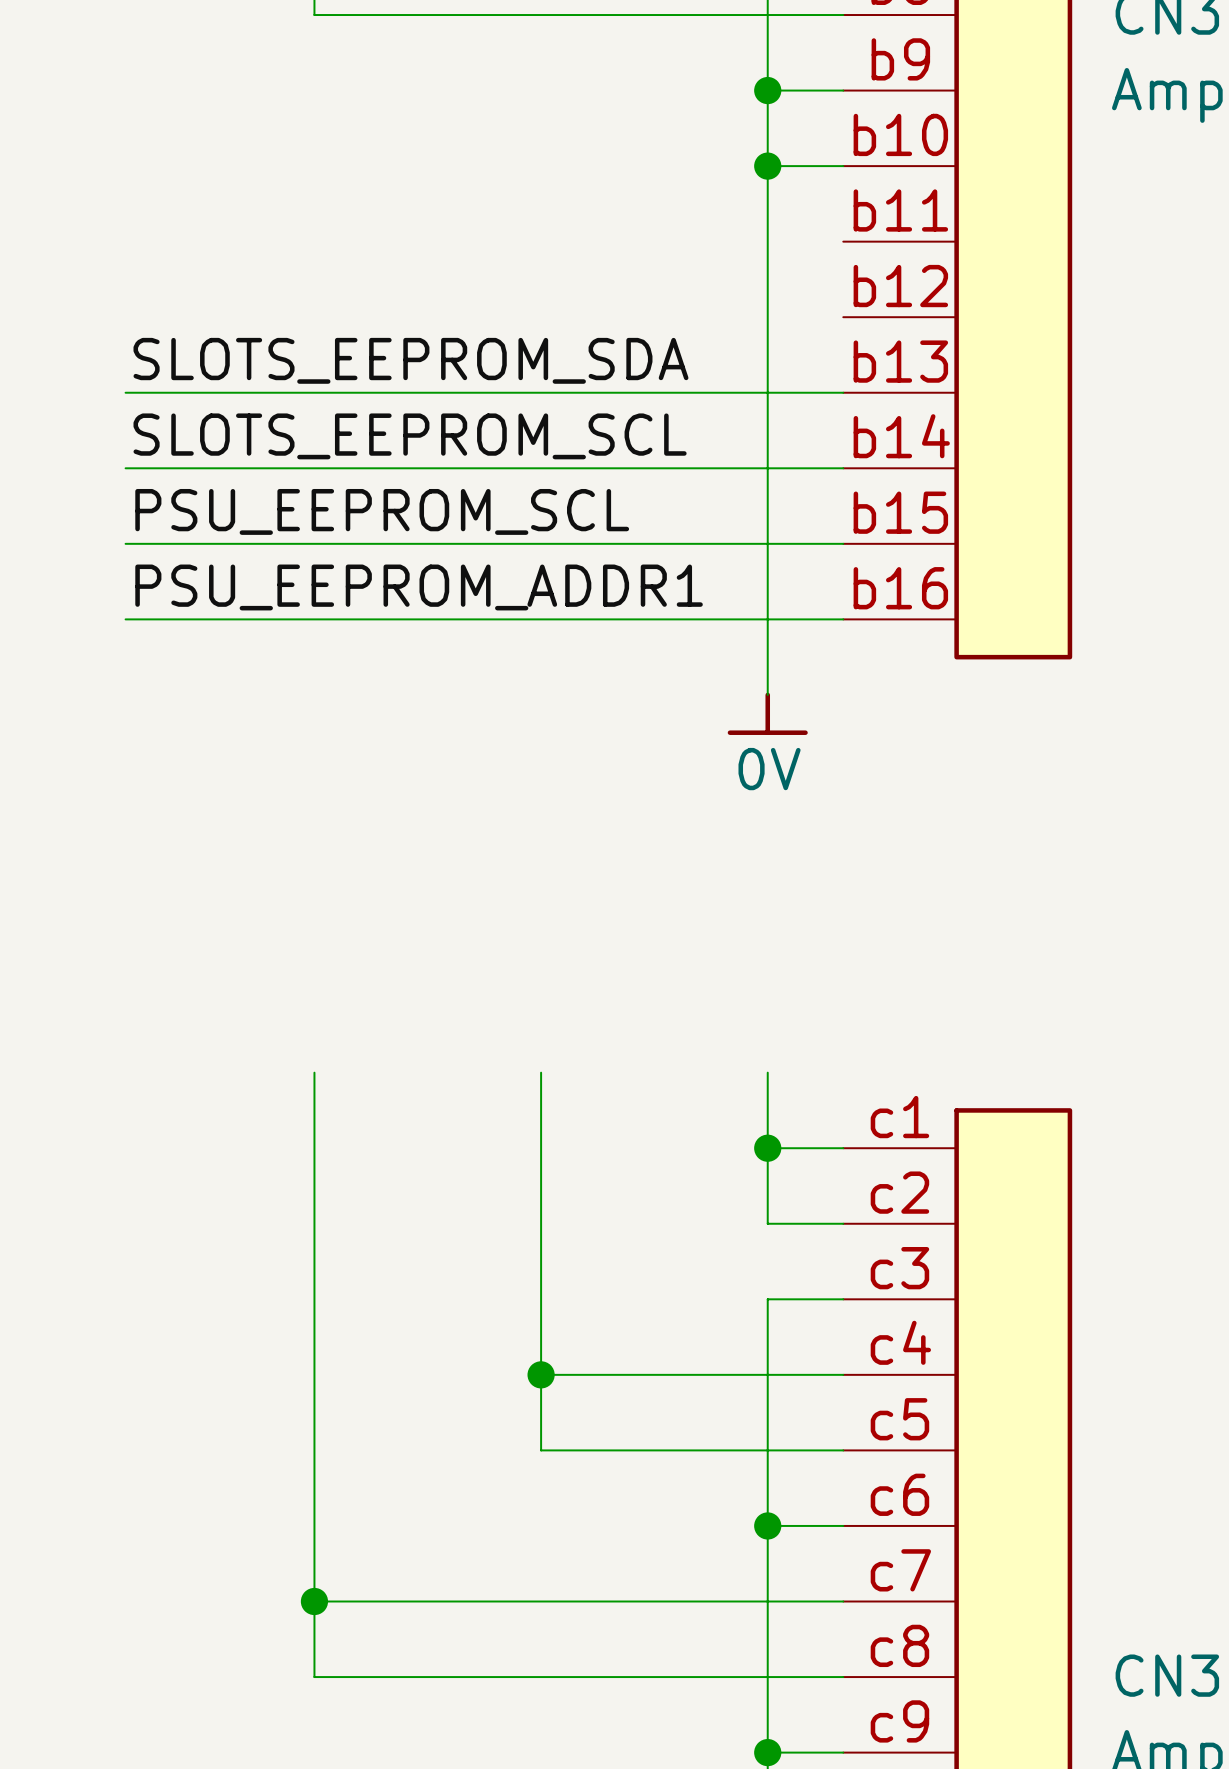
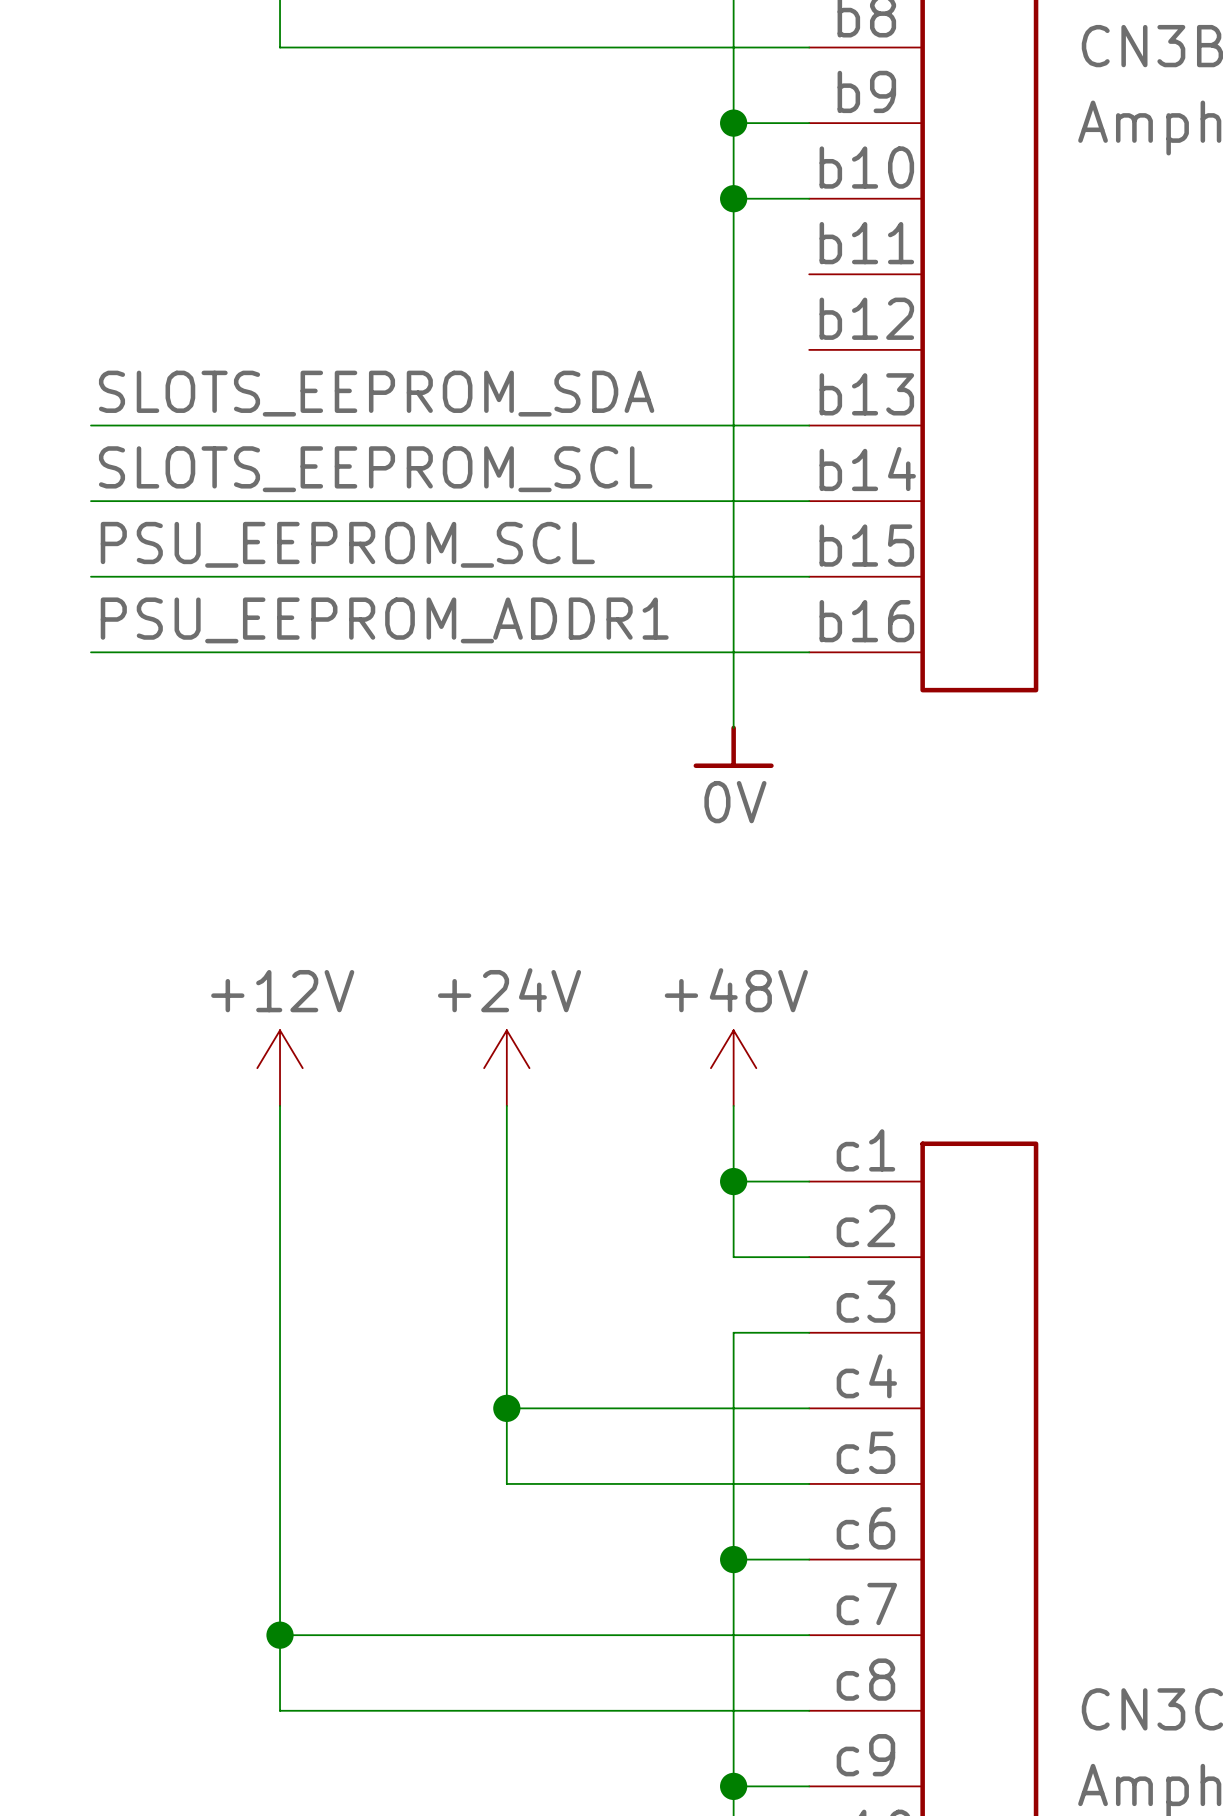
power symbol: none -> +12V (280, 1068)
power symbol: none -> +24V (506, 1068)
power symbol: none -> +48V (733, 1068)

